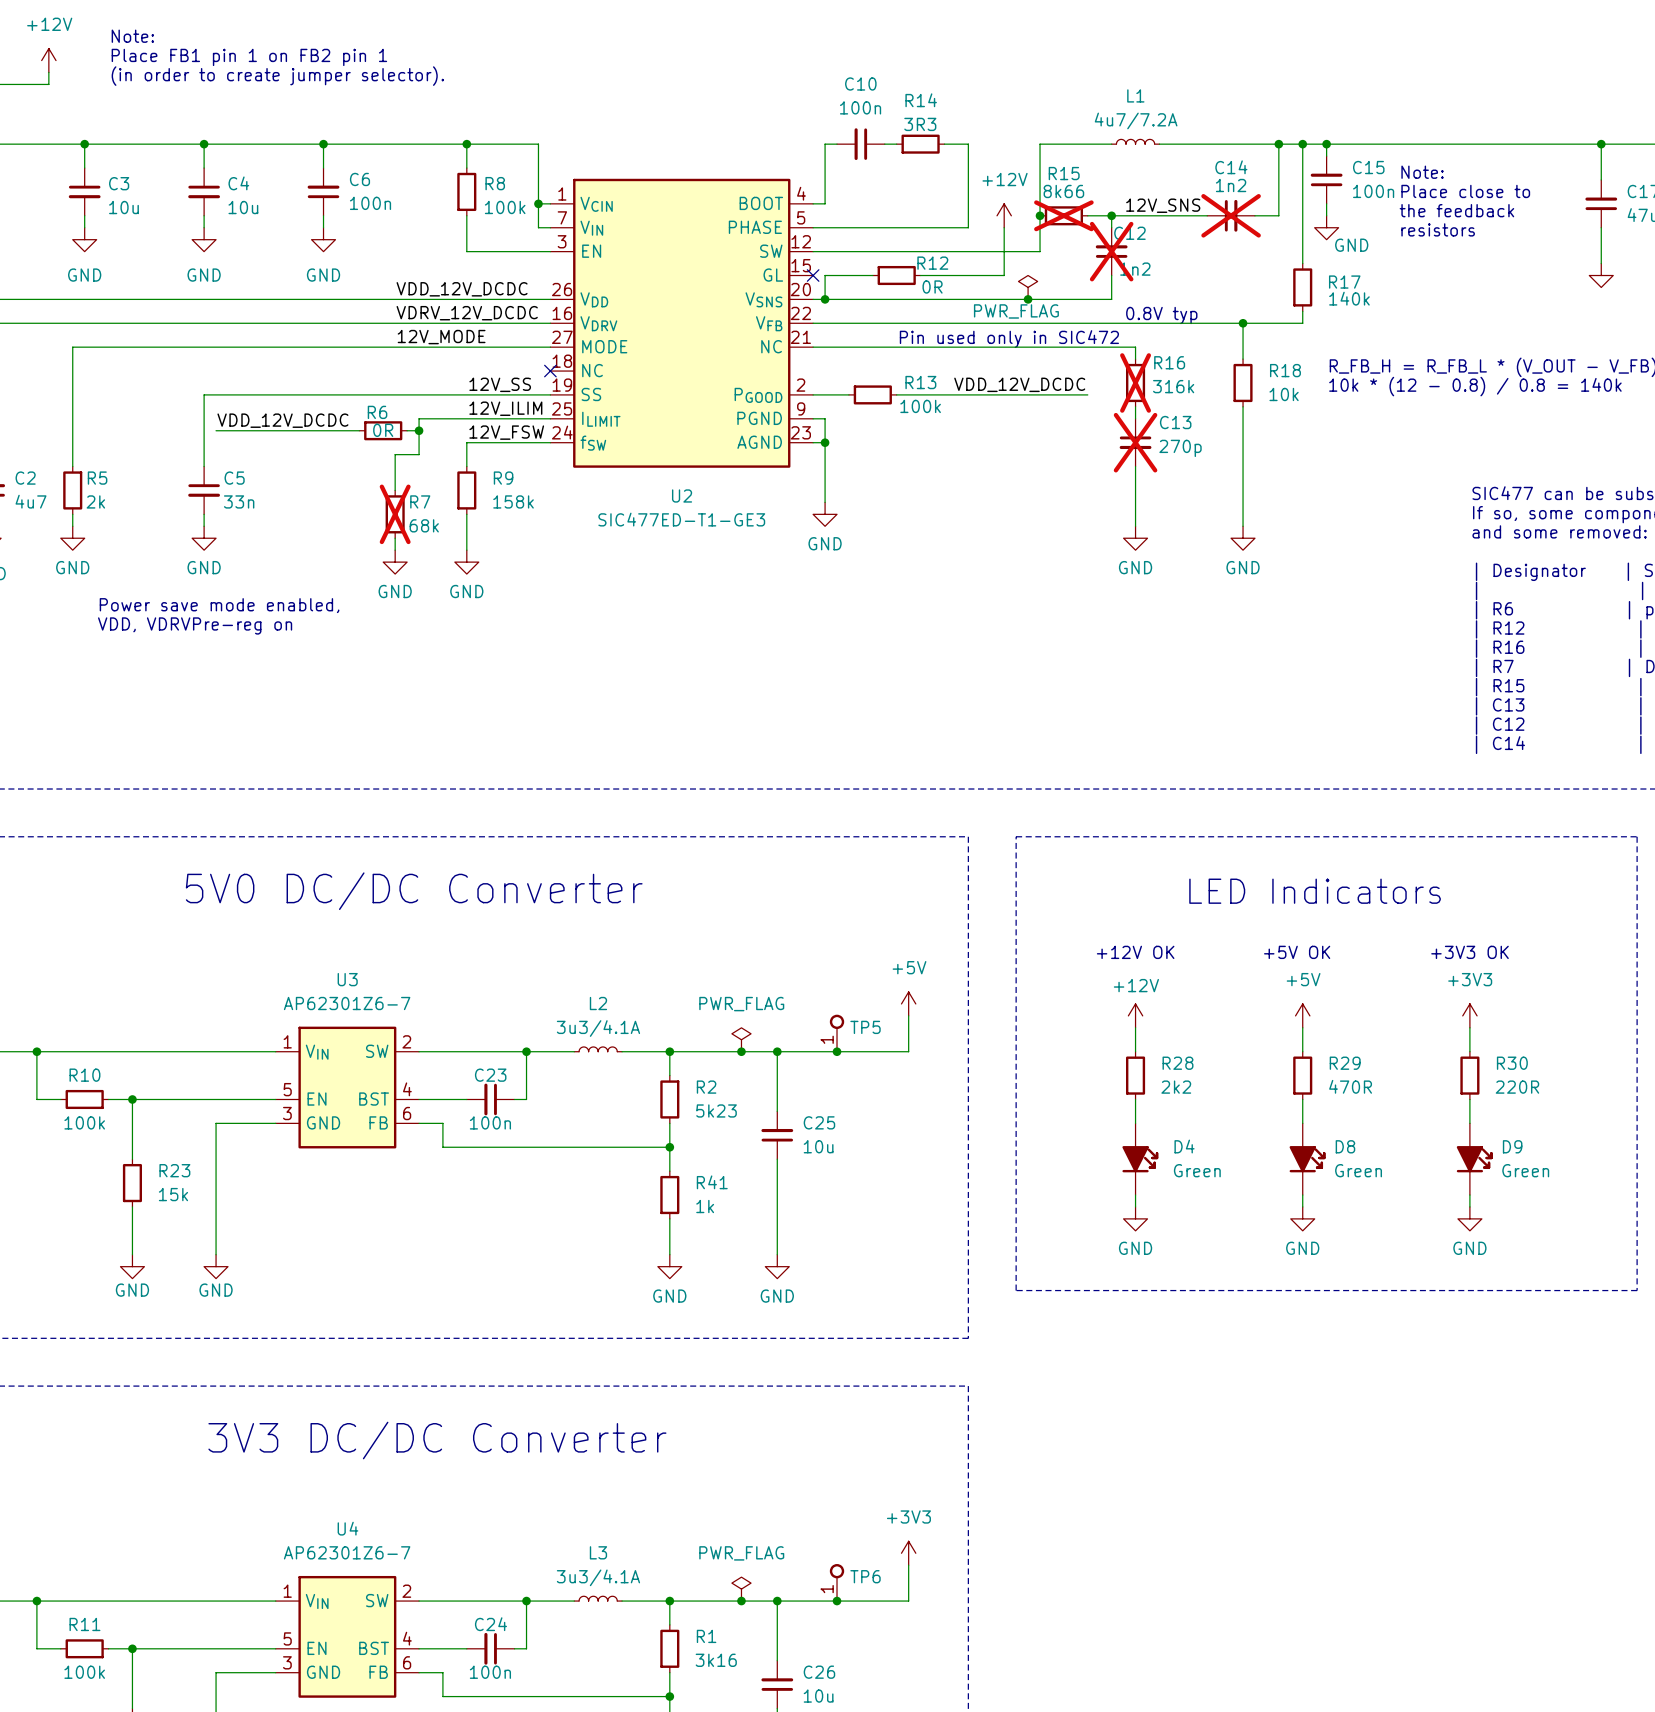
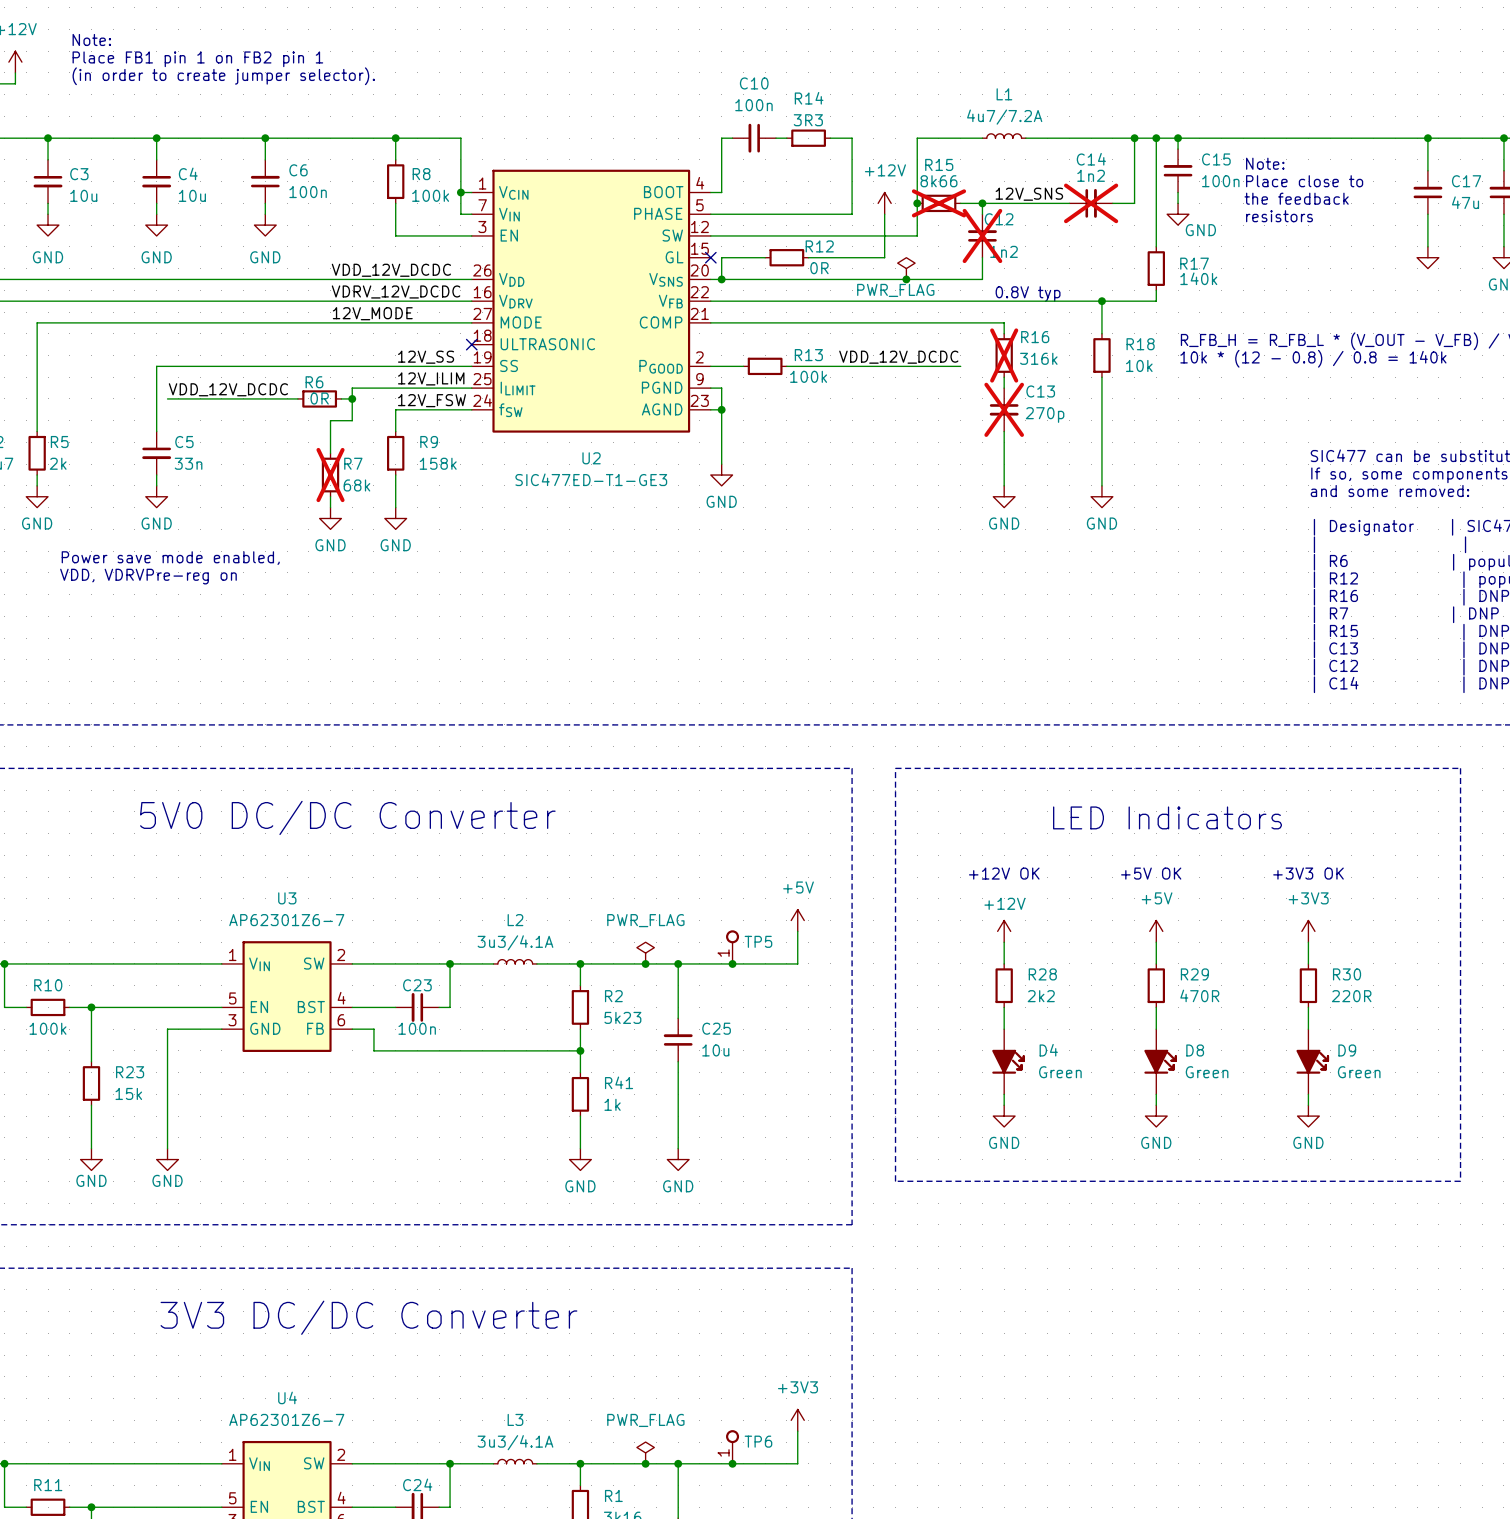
text: Pin used only in SIC472 (1009, 339) -> none
U2 pin name: NC (771, 346) -> COMP (661, 322)
U2 pin name: NC (592, 370) -> ULTRASONIC (547, 344)

